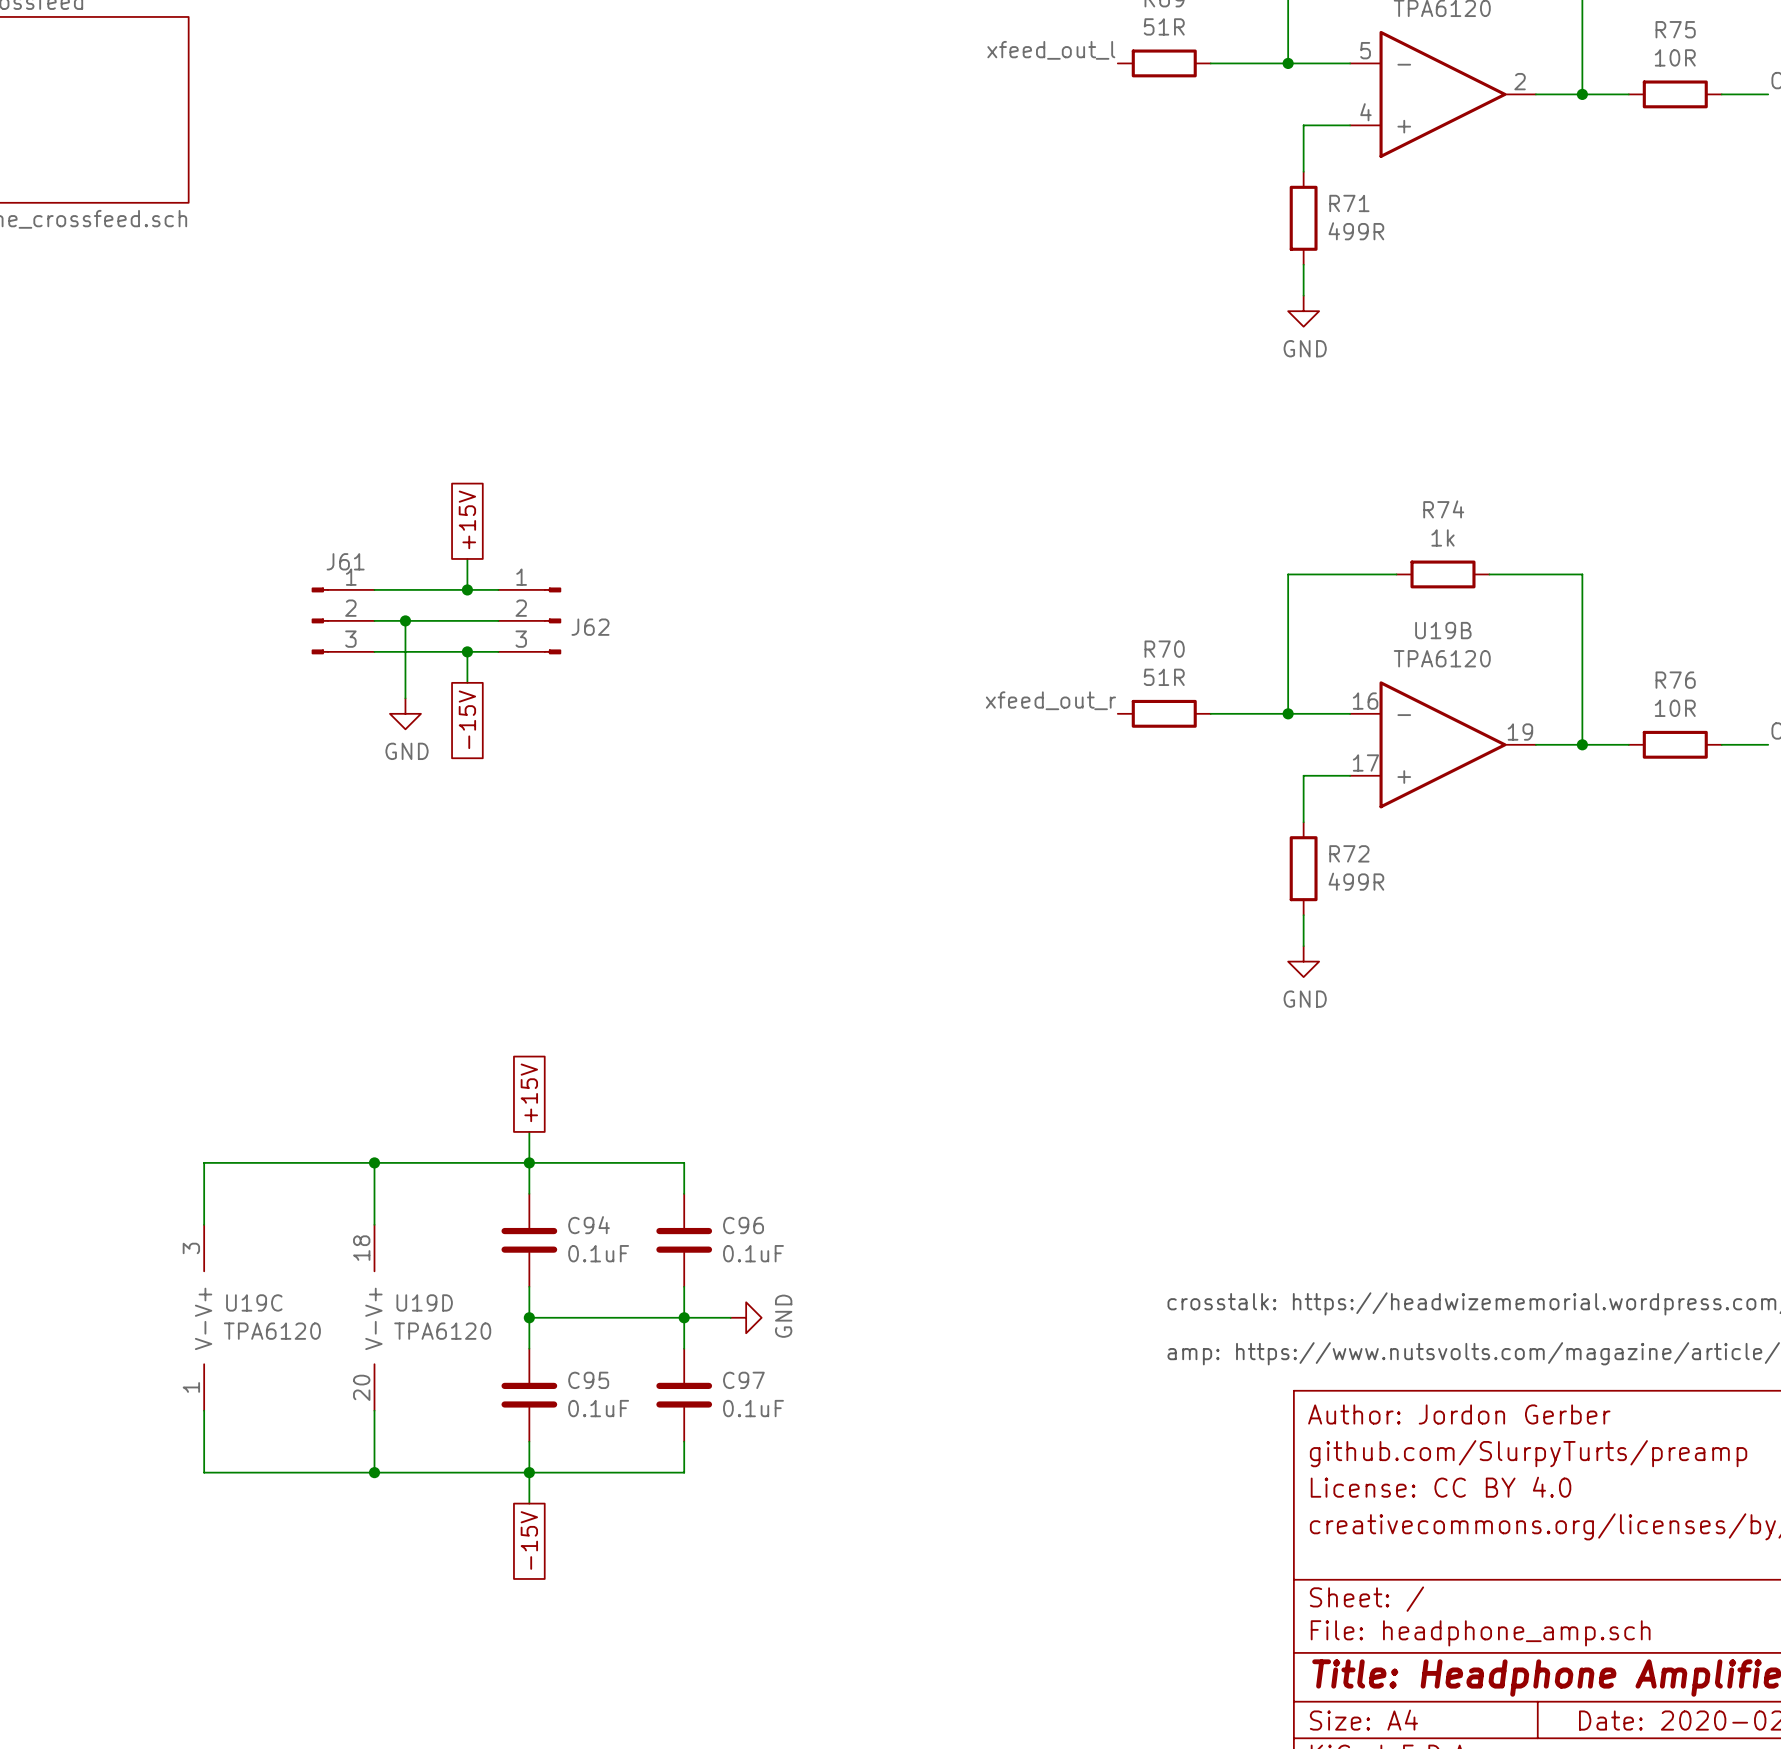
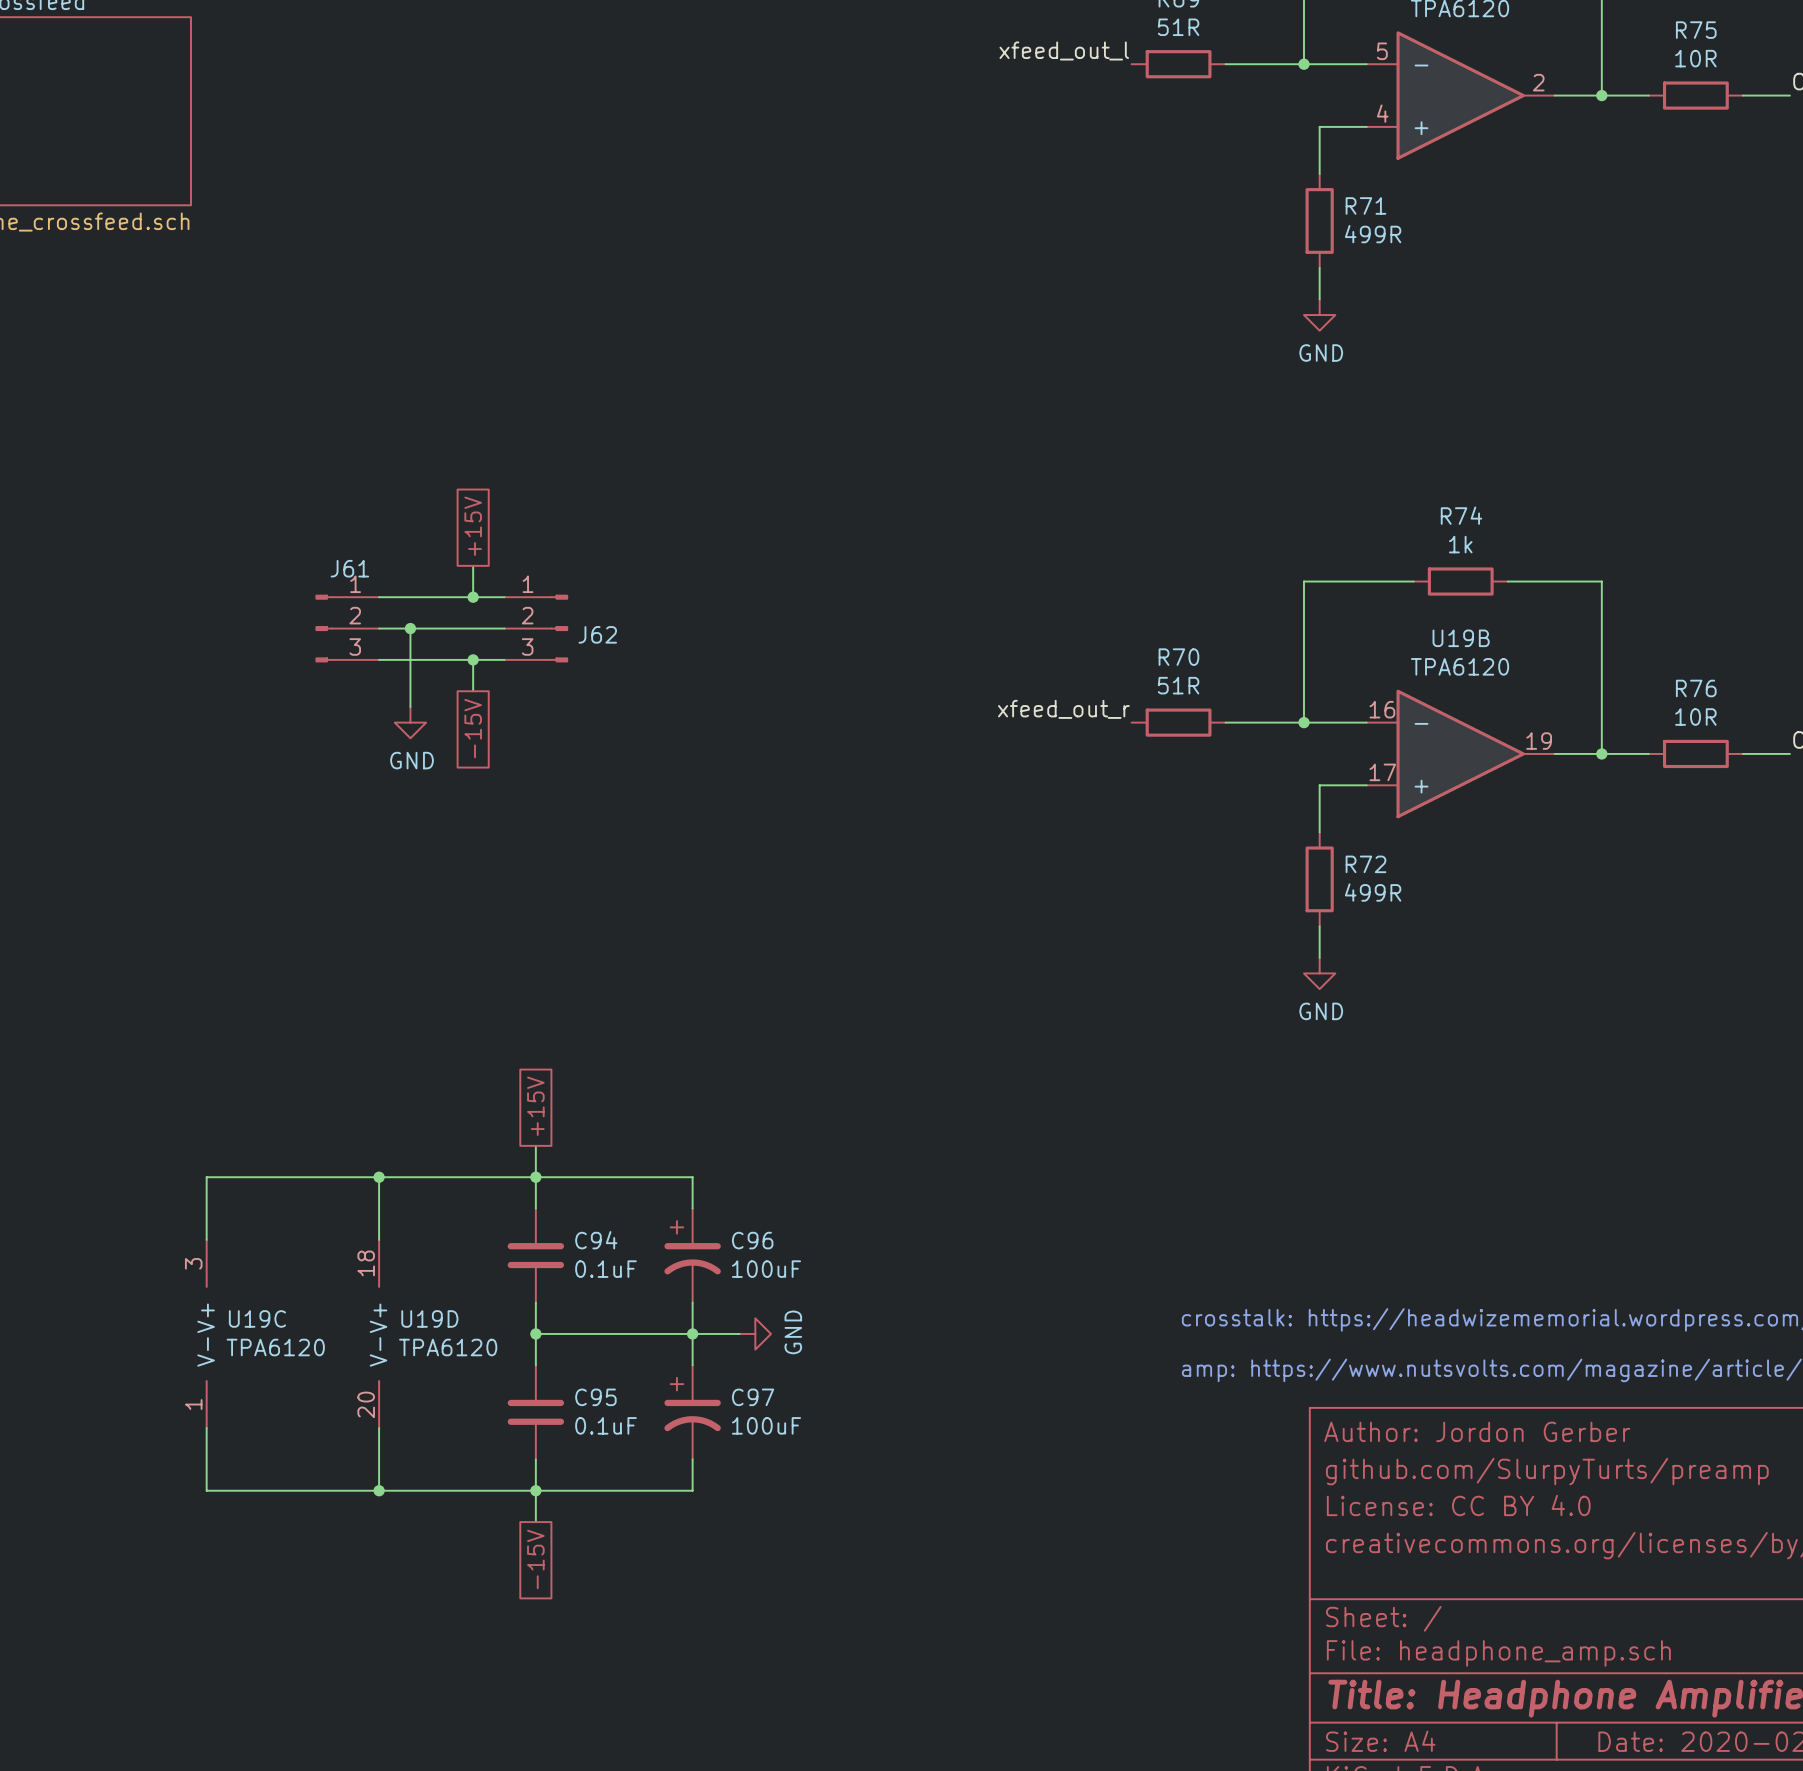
C96 symbol: [656, 1193, 713, 1287] -> [664, 1208, 721, 1303]
C96 value: 0.1uF (753, 1253) -> 100uF (766, 1269)
C97 symbol: [656, 1348, 713, 1442] -> [664, 1365, 721, 1460]
C97 value: 0.1uF (753, 1408) -> 100uF (766, 1425)

